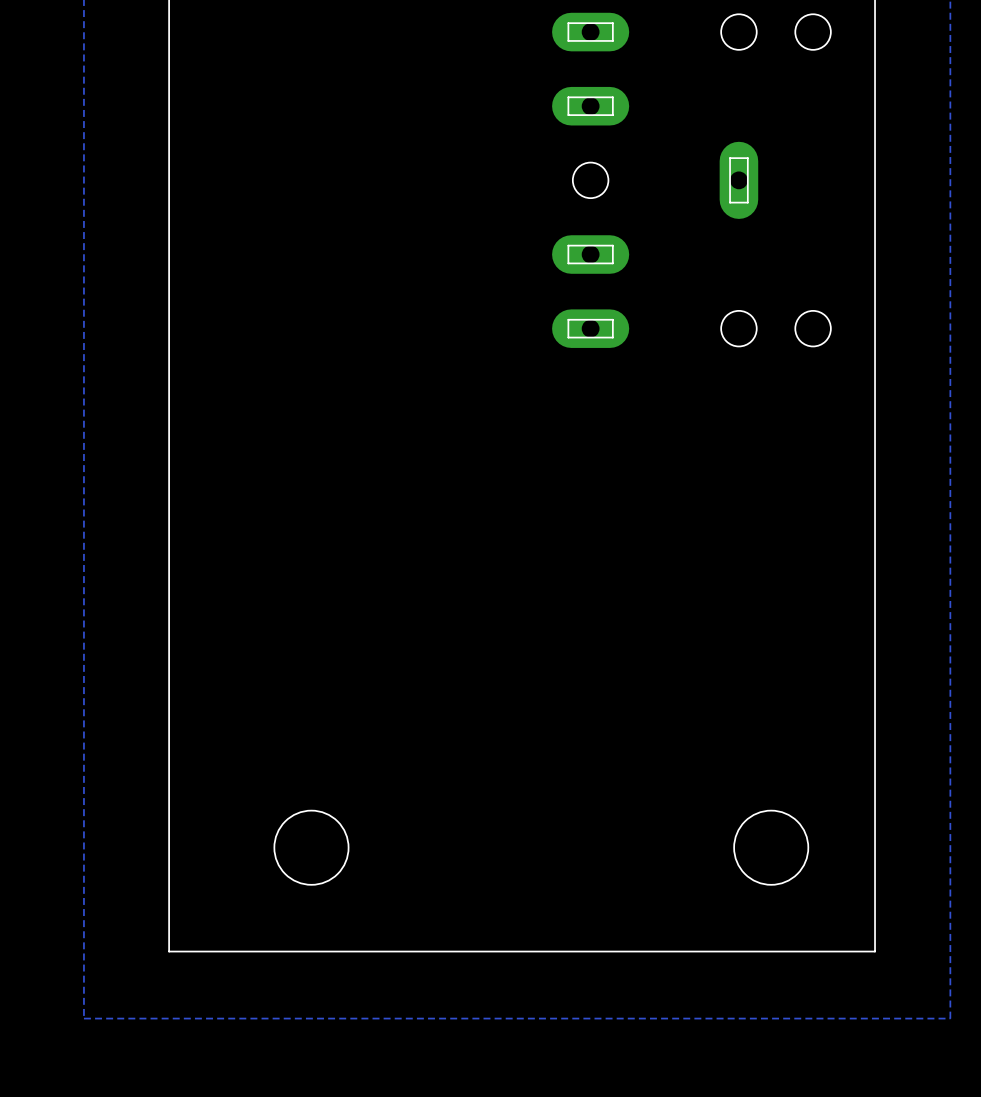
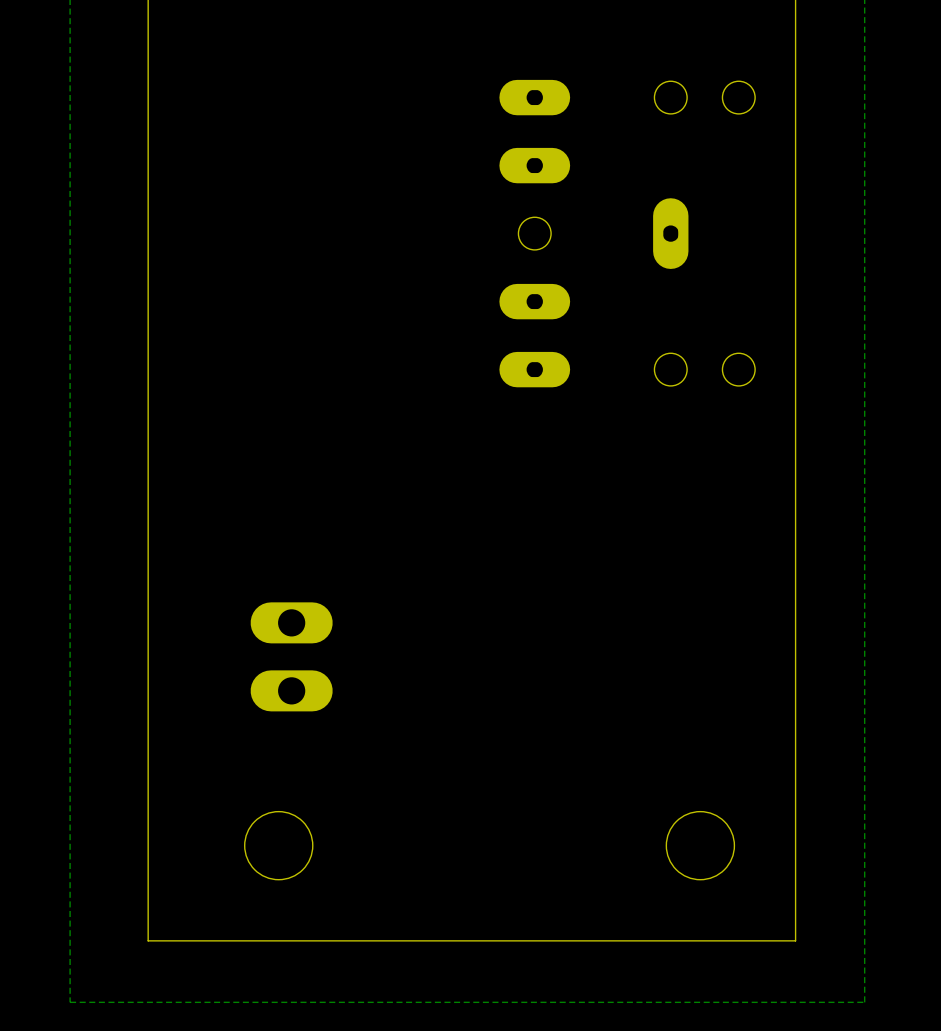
part: none -> (291, 656)

